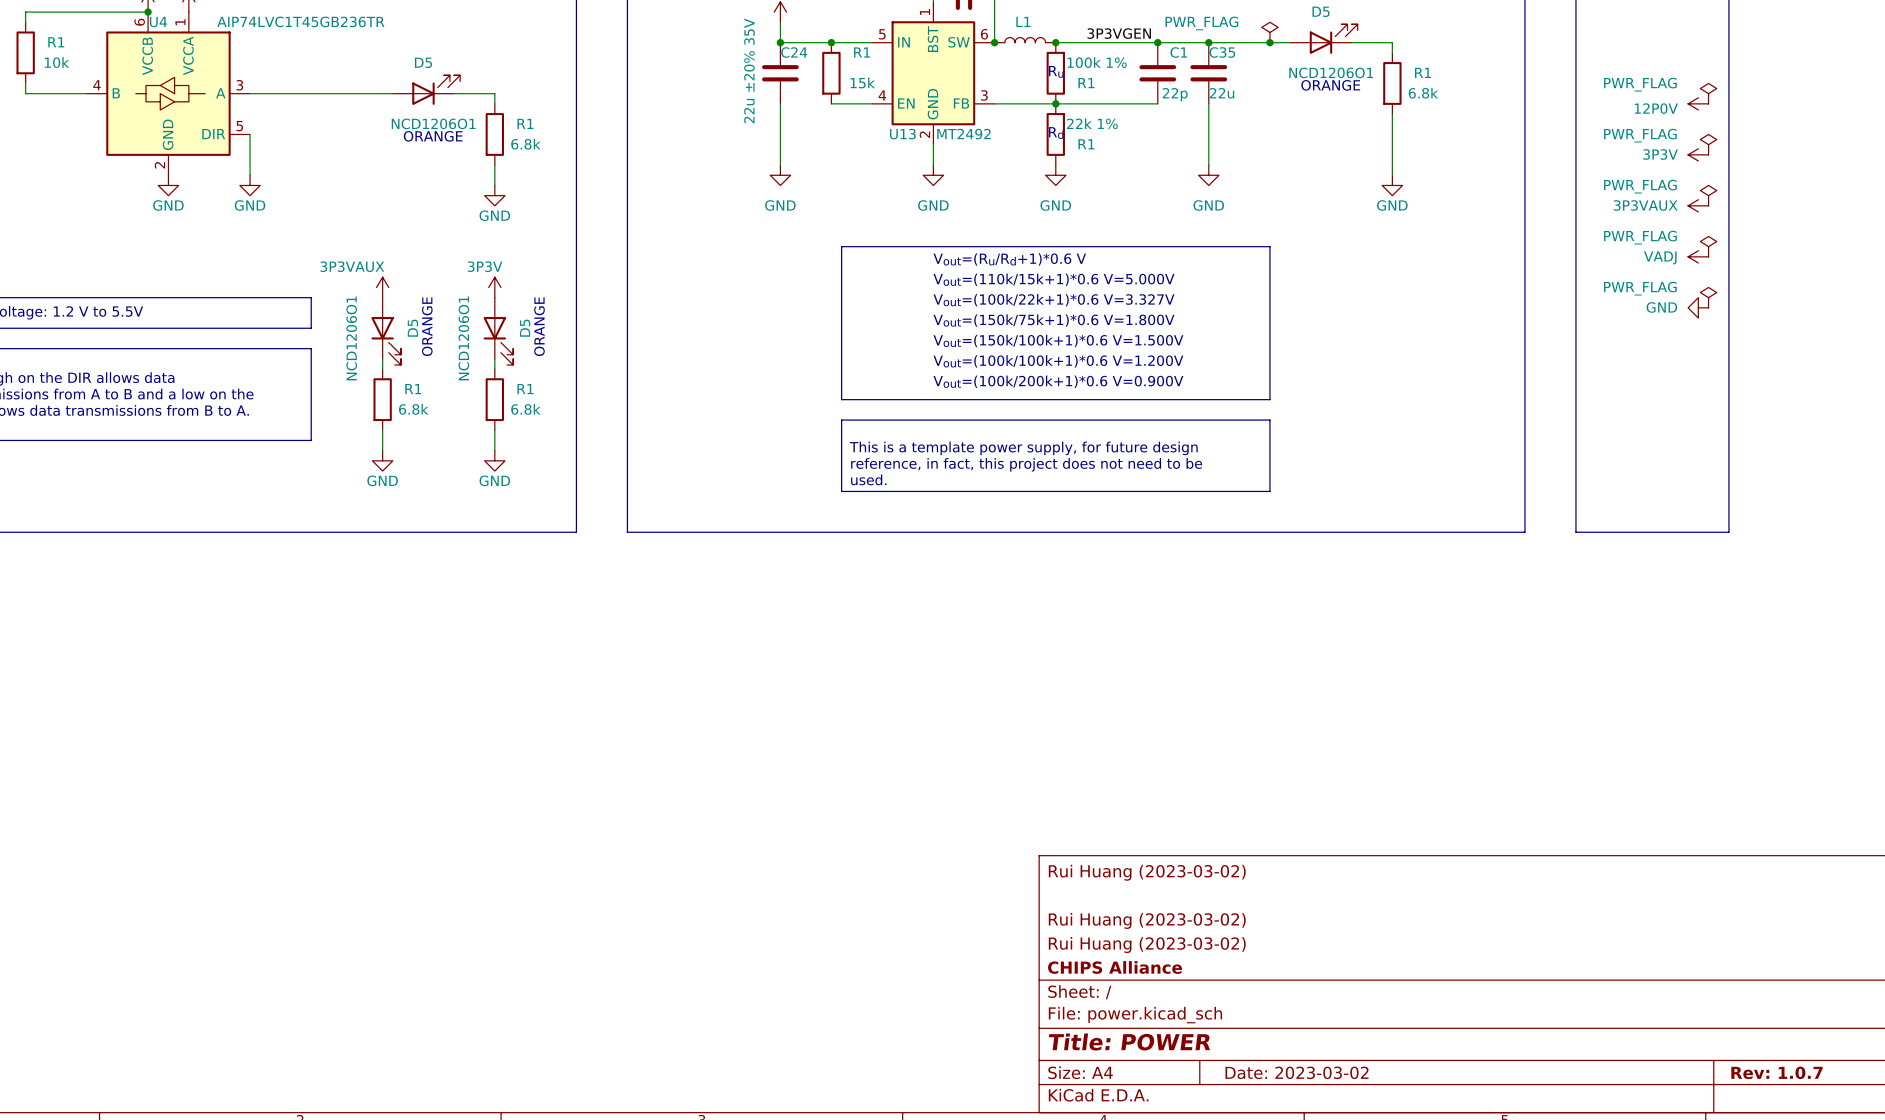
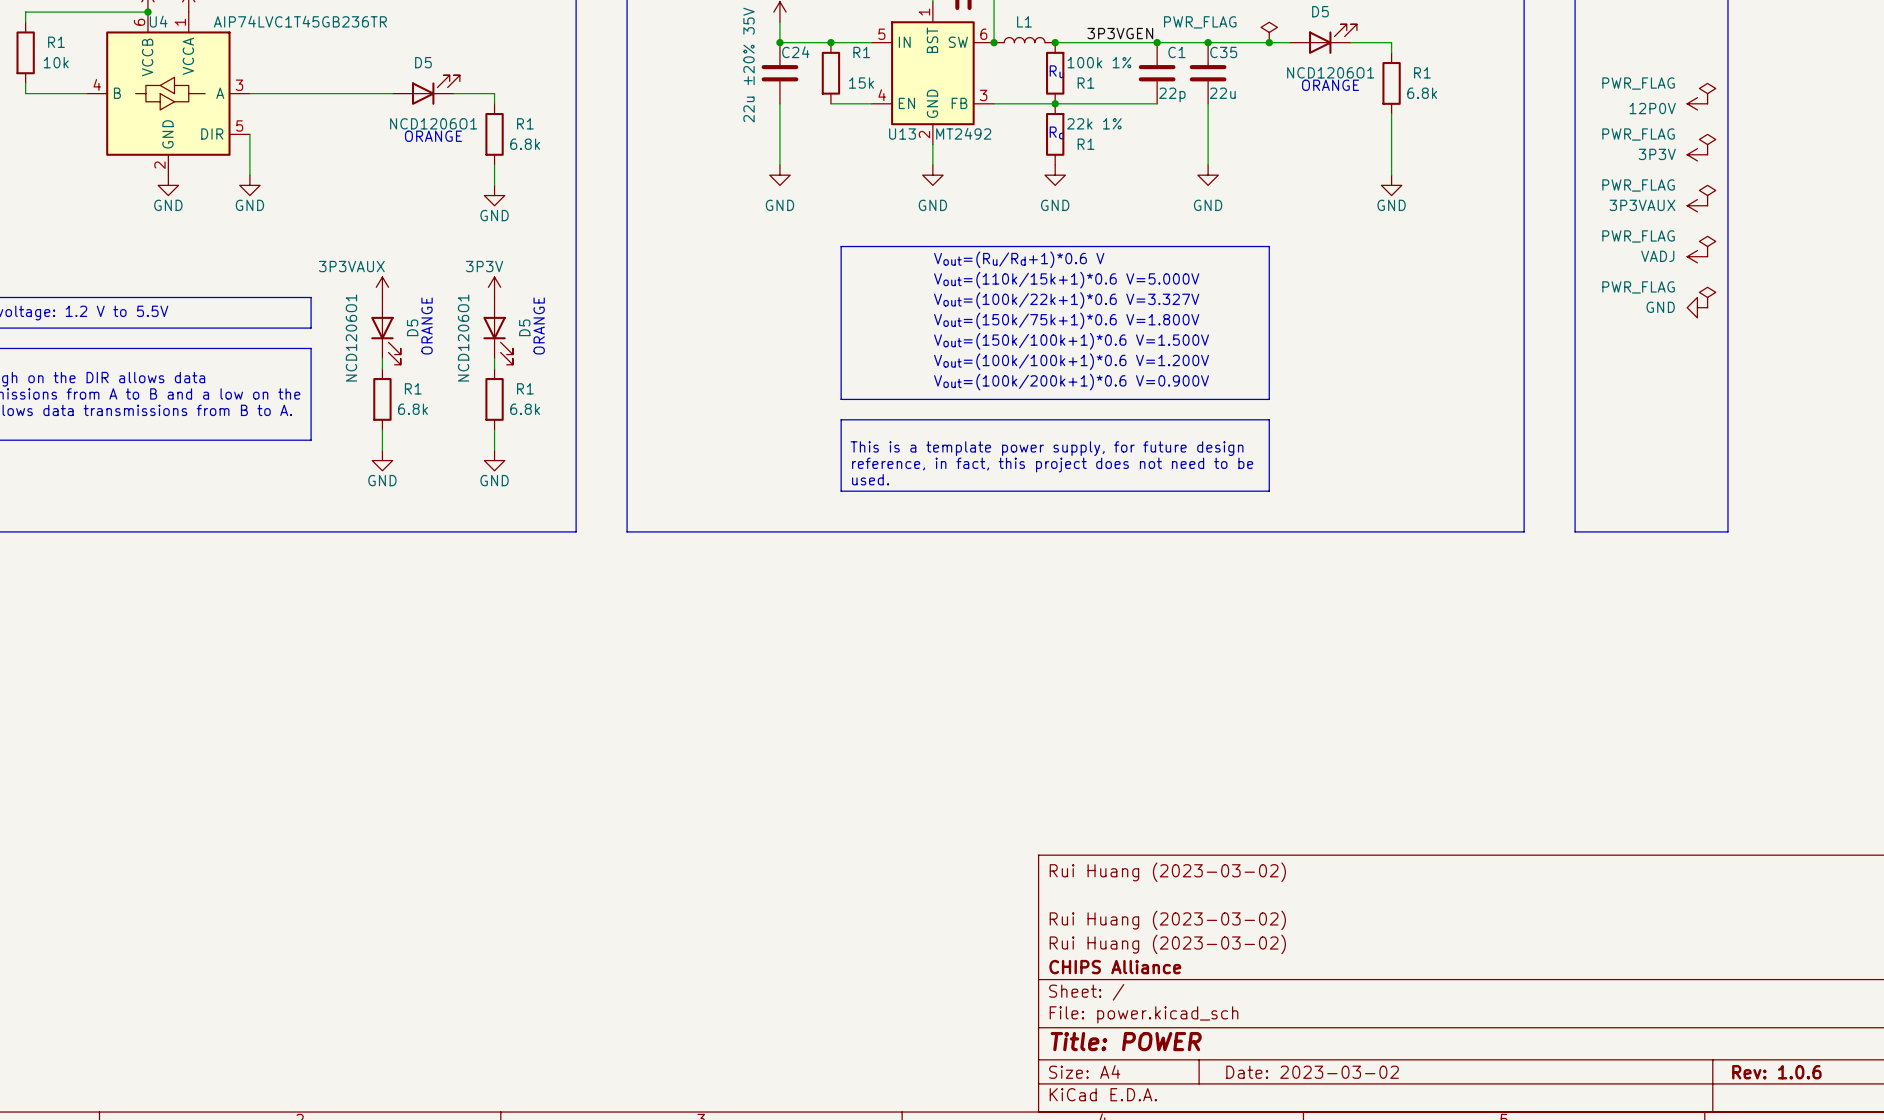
title block: Rev: 1.0.7 (1776, 1072) -> Rev: 1.0.6 (1776, 1072)

